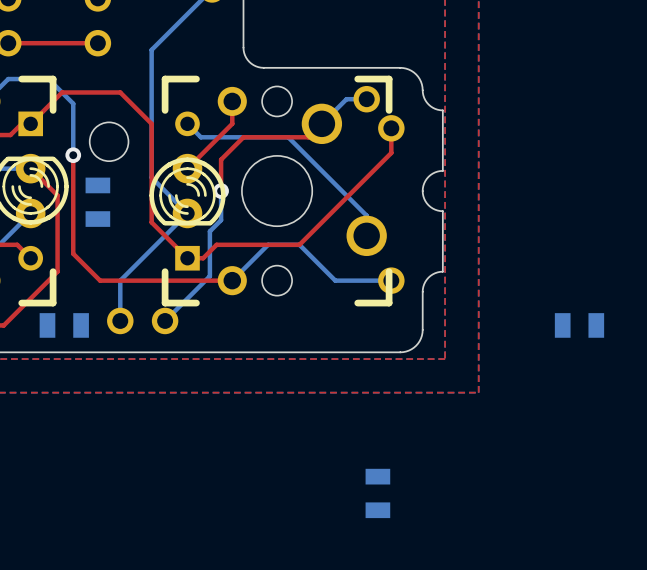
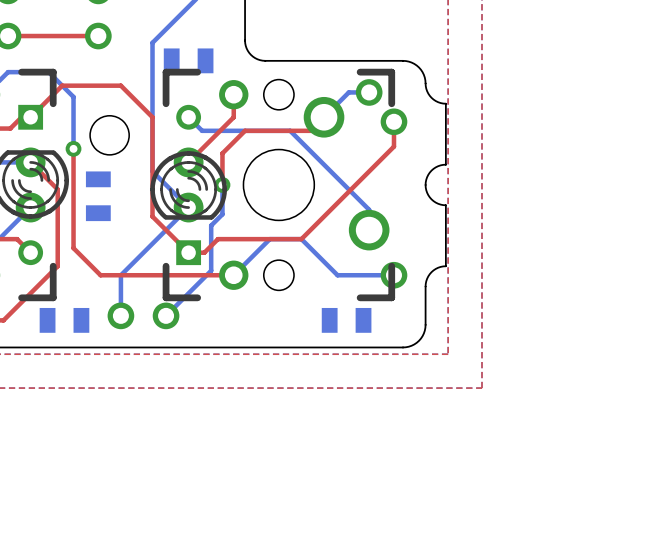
part: none -> (188, 60)
part: none -> (346, 320)
part: (579, 325) -> none
part: (377, 493) -> none

